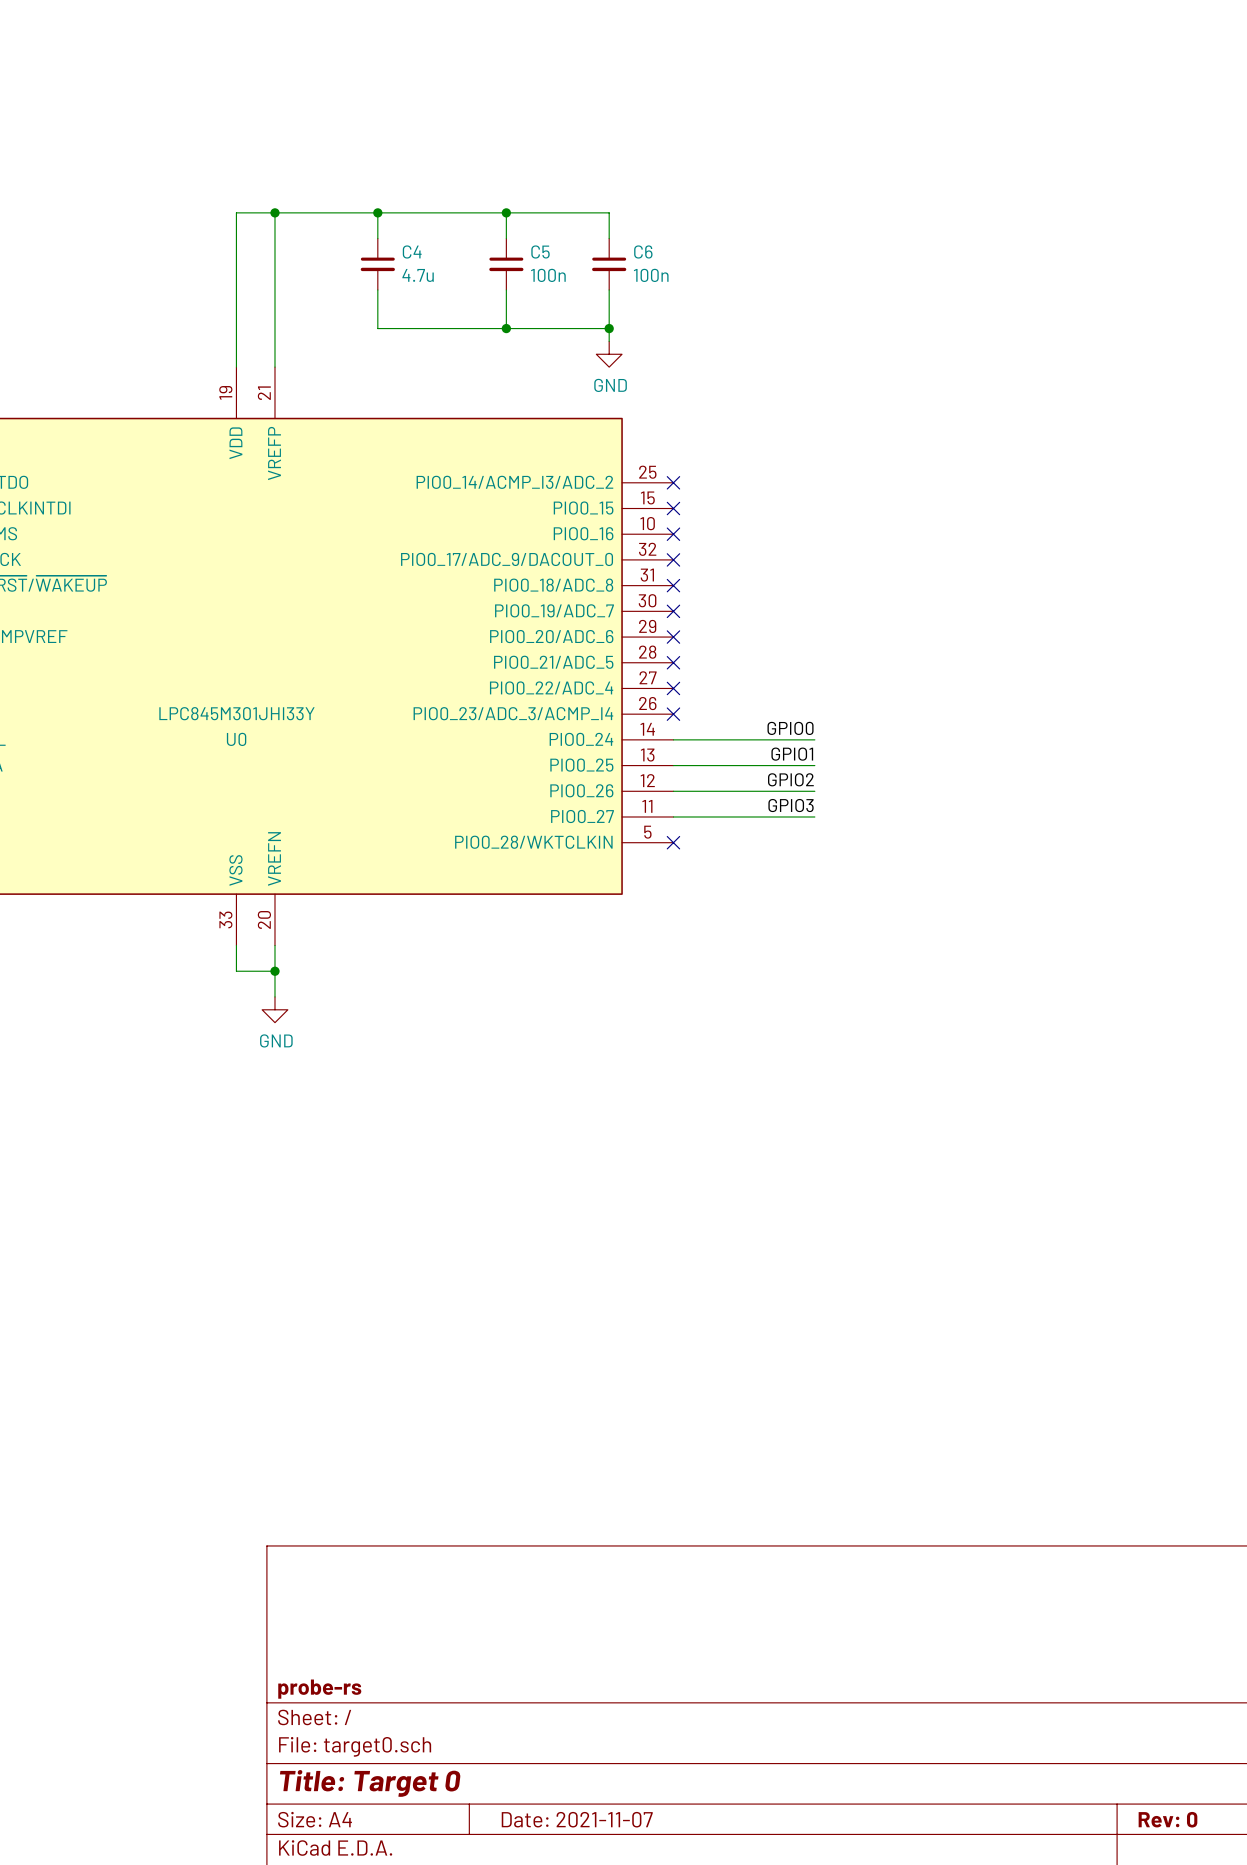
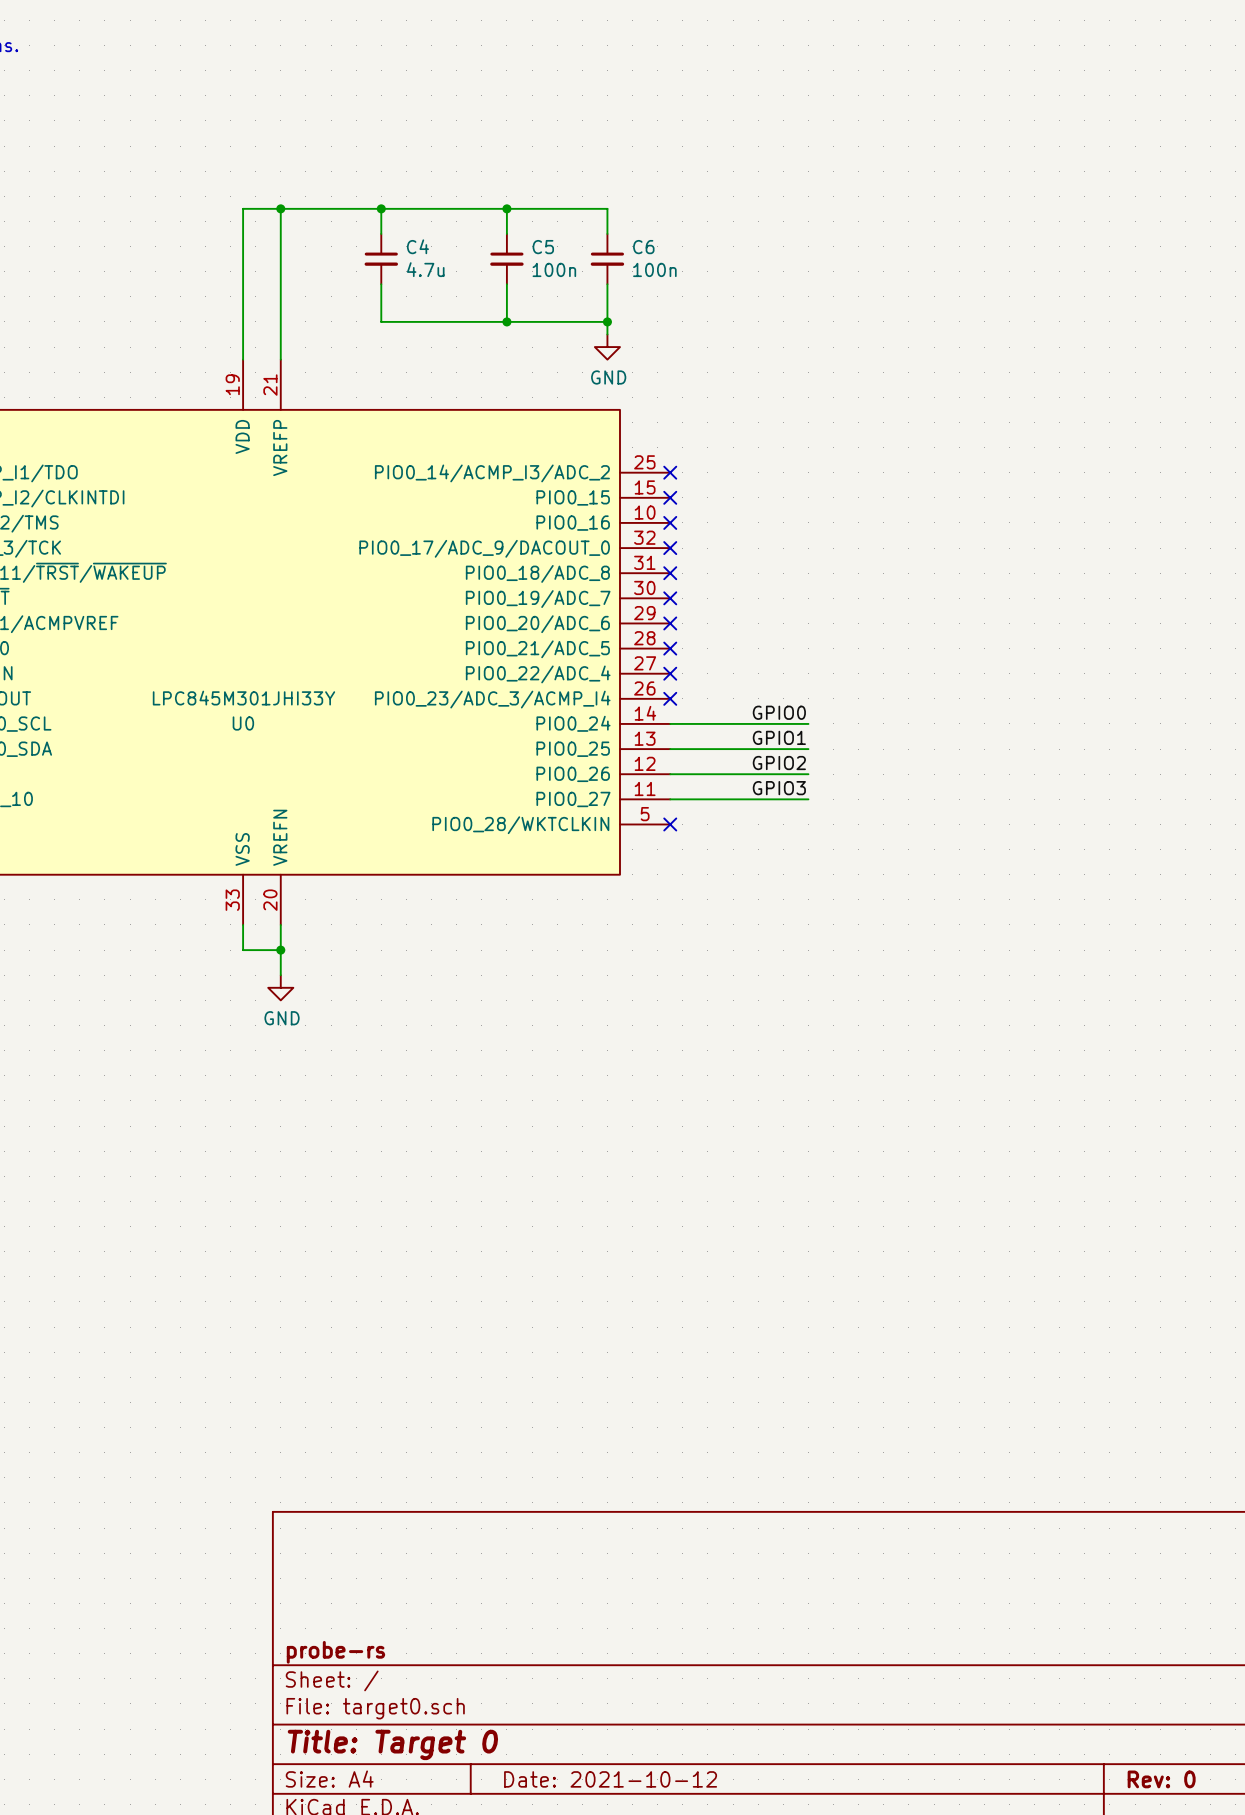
title block: Date: 2021-11-07 (577, 1819) -> Date: 2021-10-12 (610, 1779)

